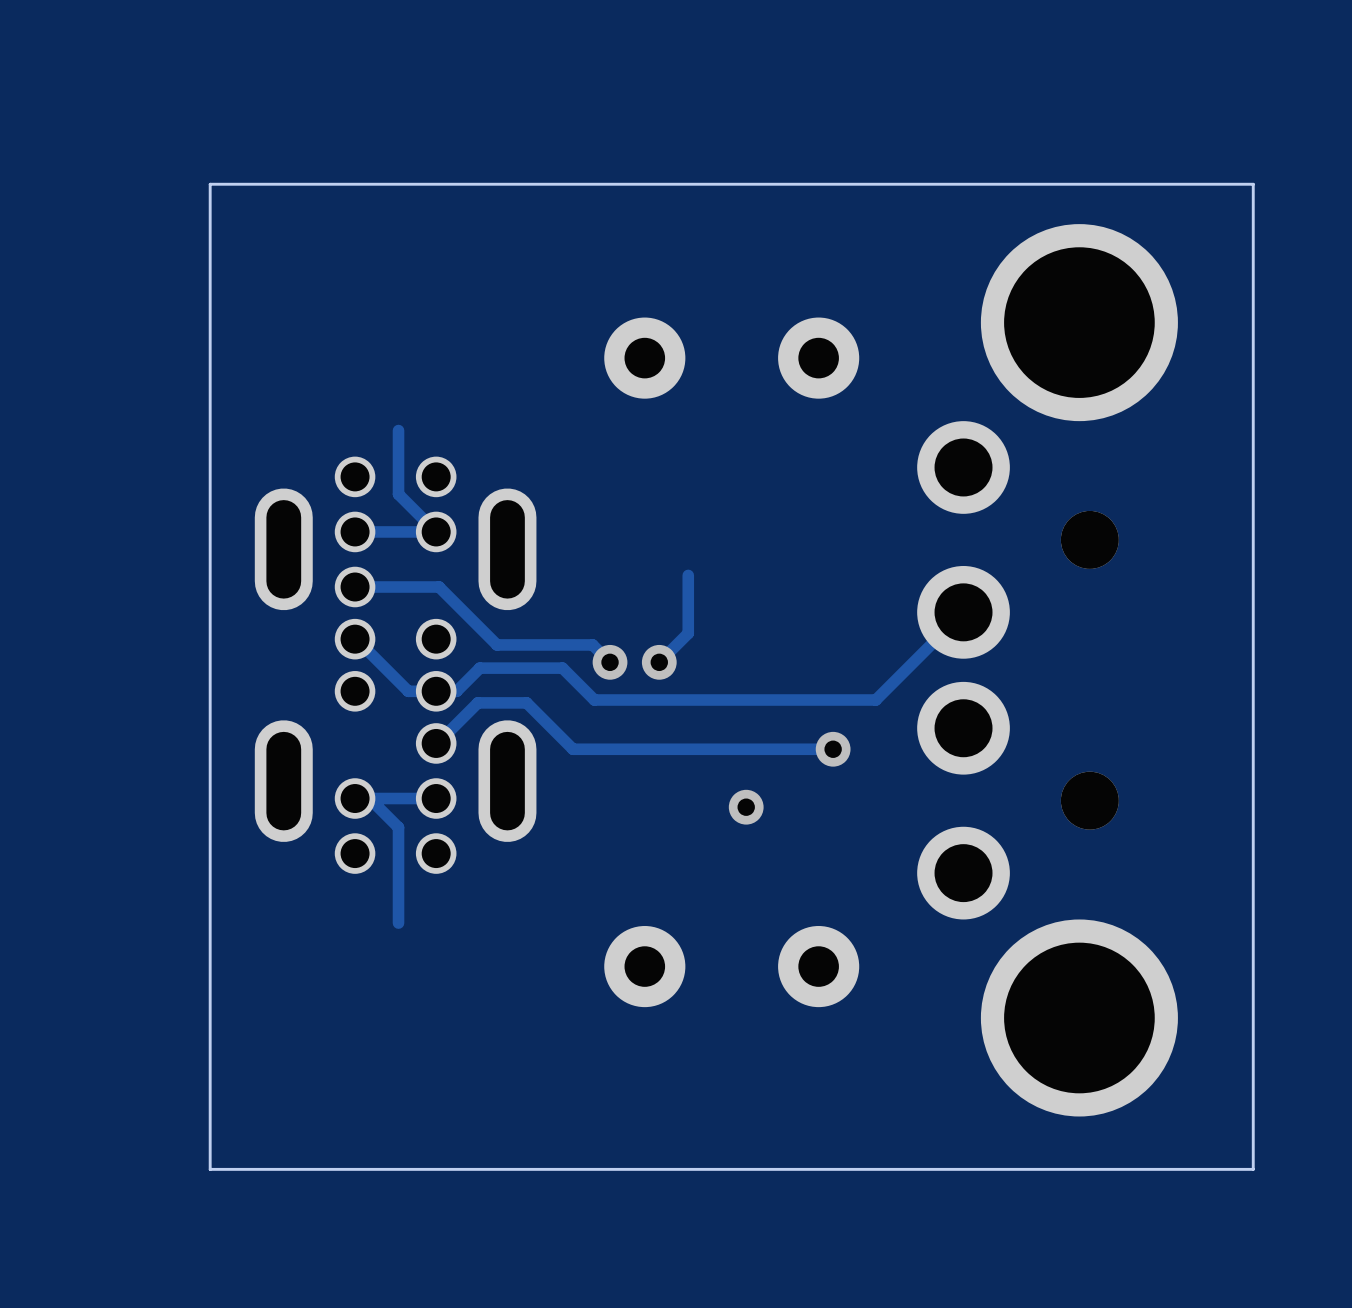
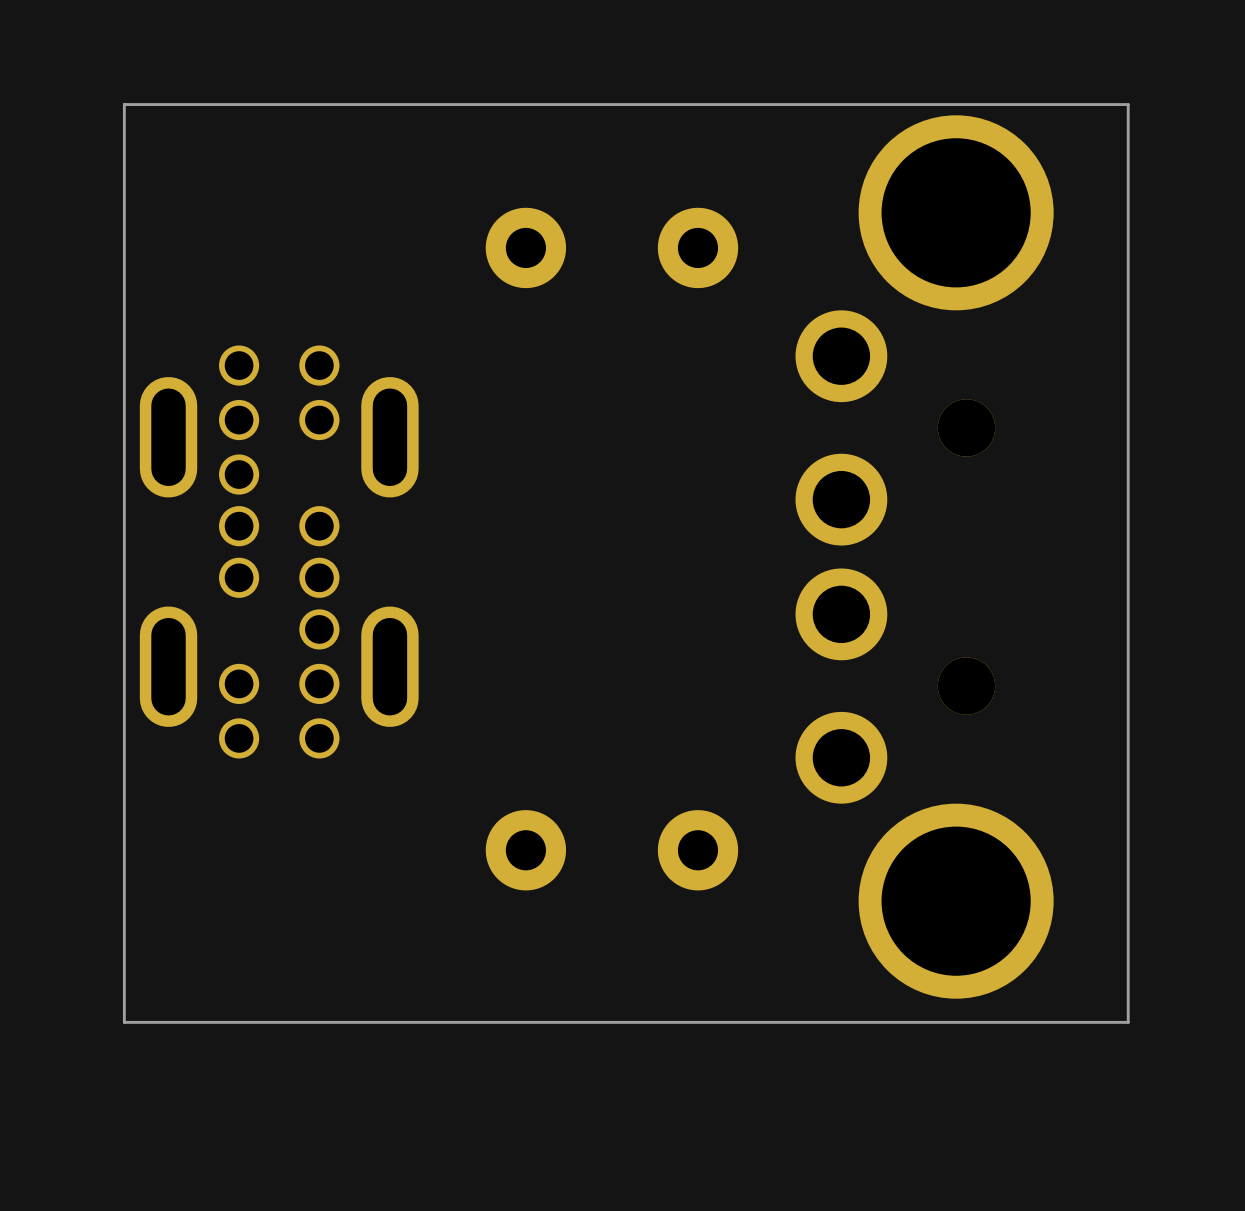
board edge: (1253, 213) (1253, 184) (210, 184) (210, 1169) (1253, 1169) (1253, 1140) -> (1128, 104) (124, 104) (124, 1022) (1128, 1022)
track: (398, 430) (398, 494) (436, 531) (355, 531) -> none
track: (688, 575) (688, 633) (659, 662) -> none
track: (355, 587) (439, 587) (497, 644) (592, 644) (610, 662) -> none
track: (963, 612) (875, 700) (594, 700) (562, 668) (479, 668) (456, 691) (408, 691) (356, 639) -> none
via: (610, 662) -> none
via: (659, 662) -> none
track: (437, 743) (477, 702) (526, 702) (573, 749) (833, 749) -> none
via: (833, 749) -> none
track: (369, 798) (398, 827) (398, 923) -> none
track: (436, 798) (355, 798) -> none
via: (746, 807) -> none

